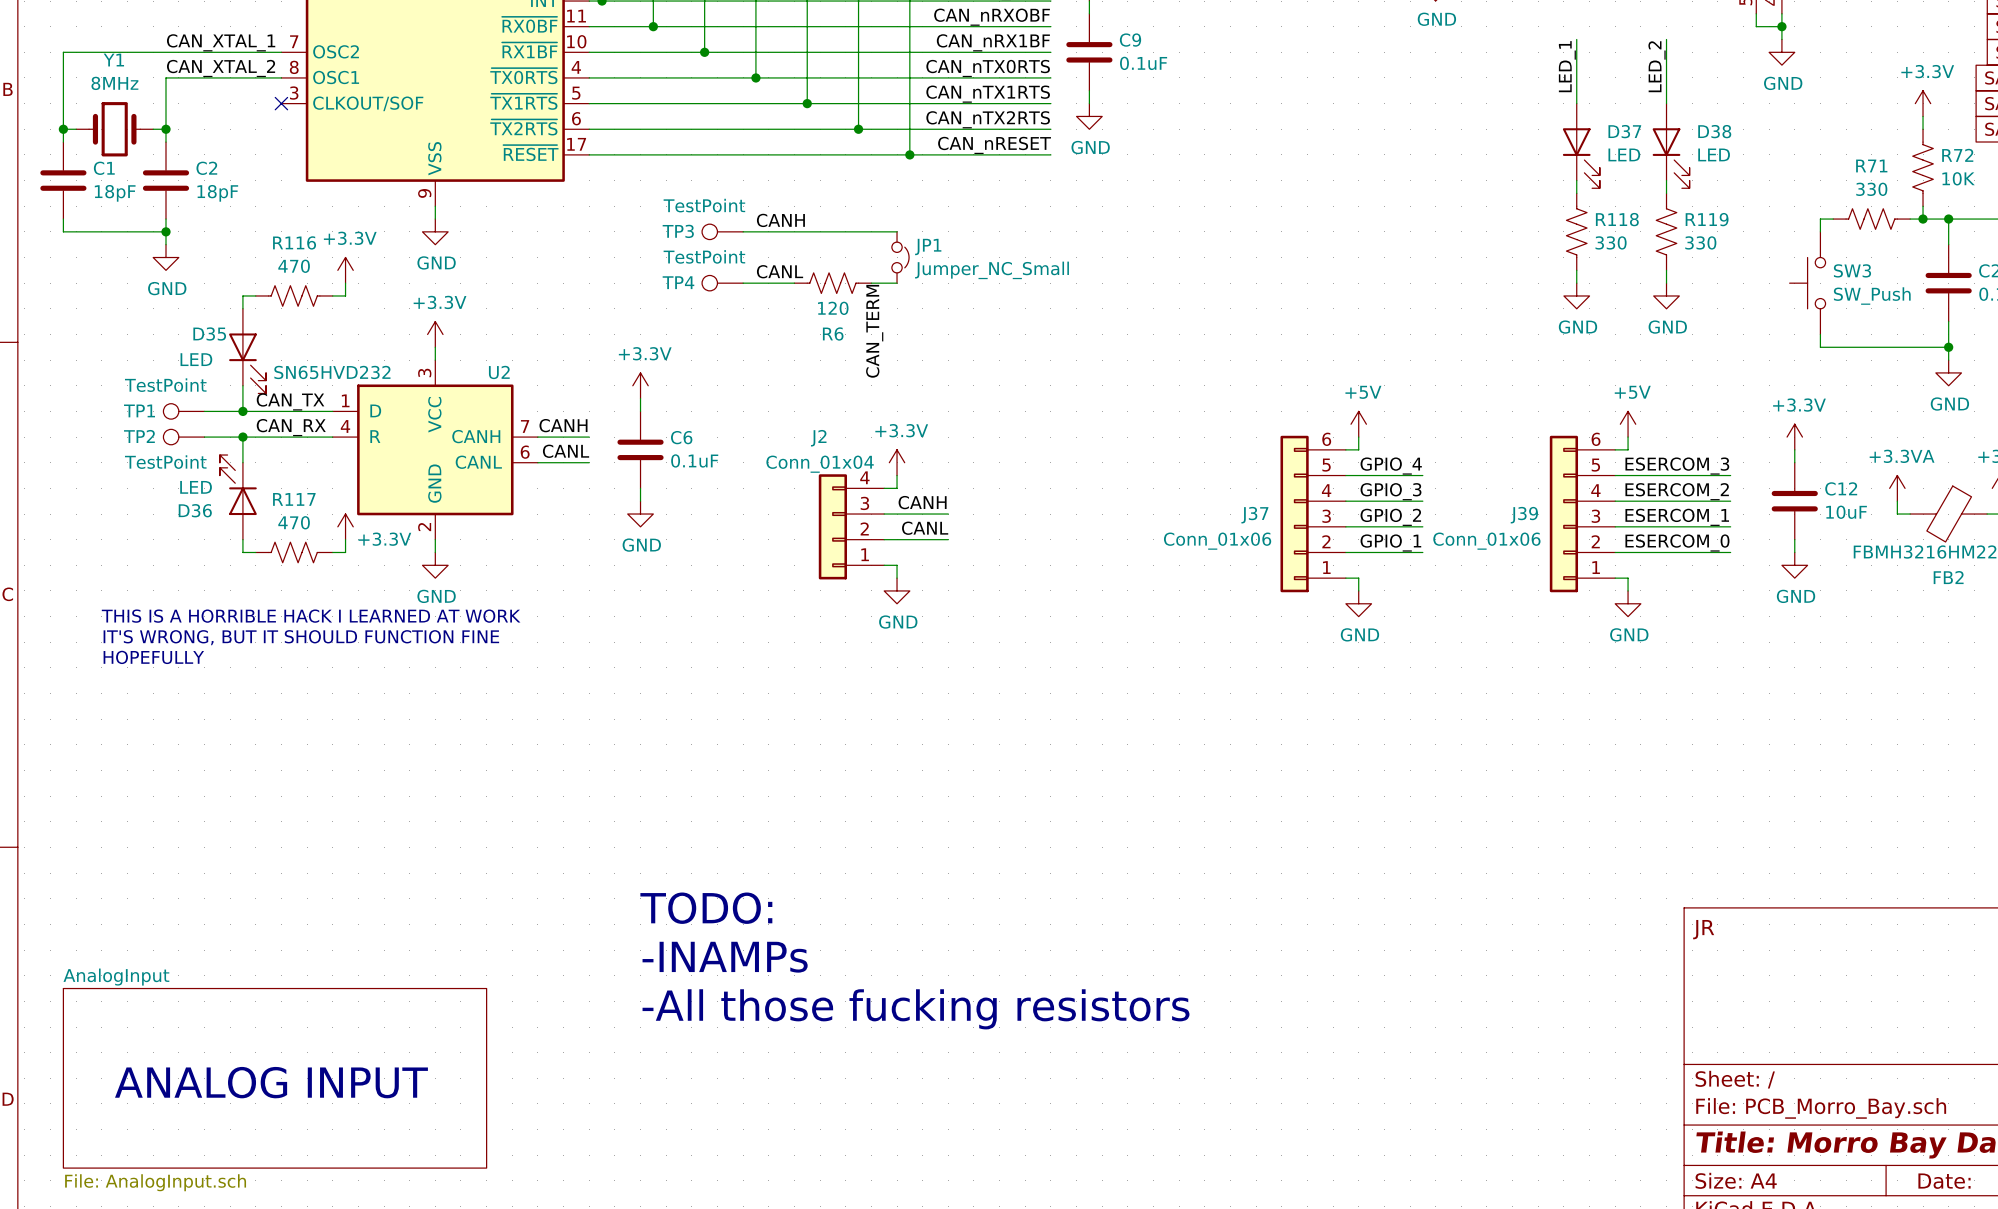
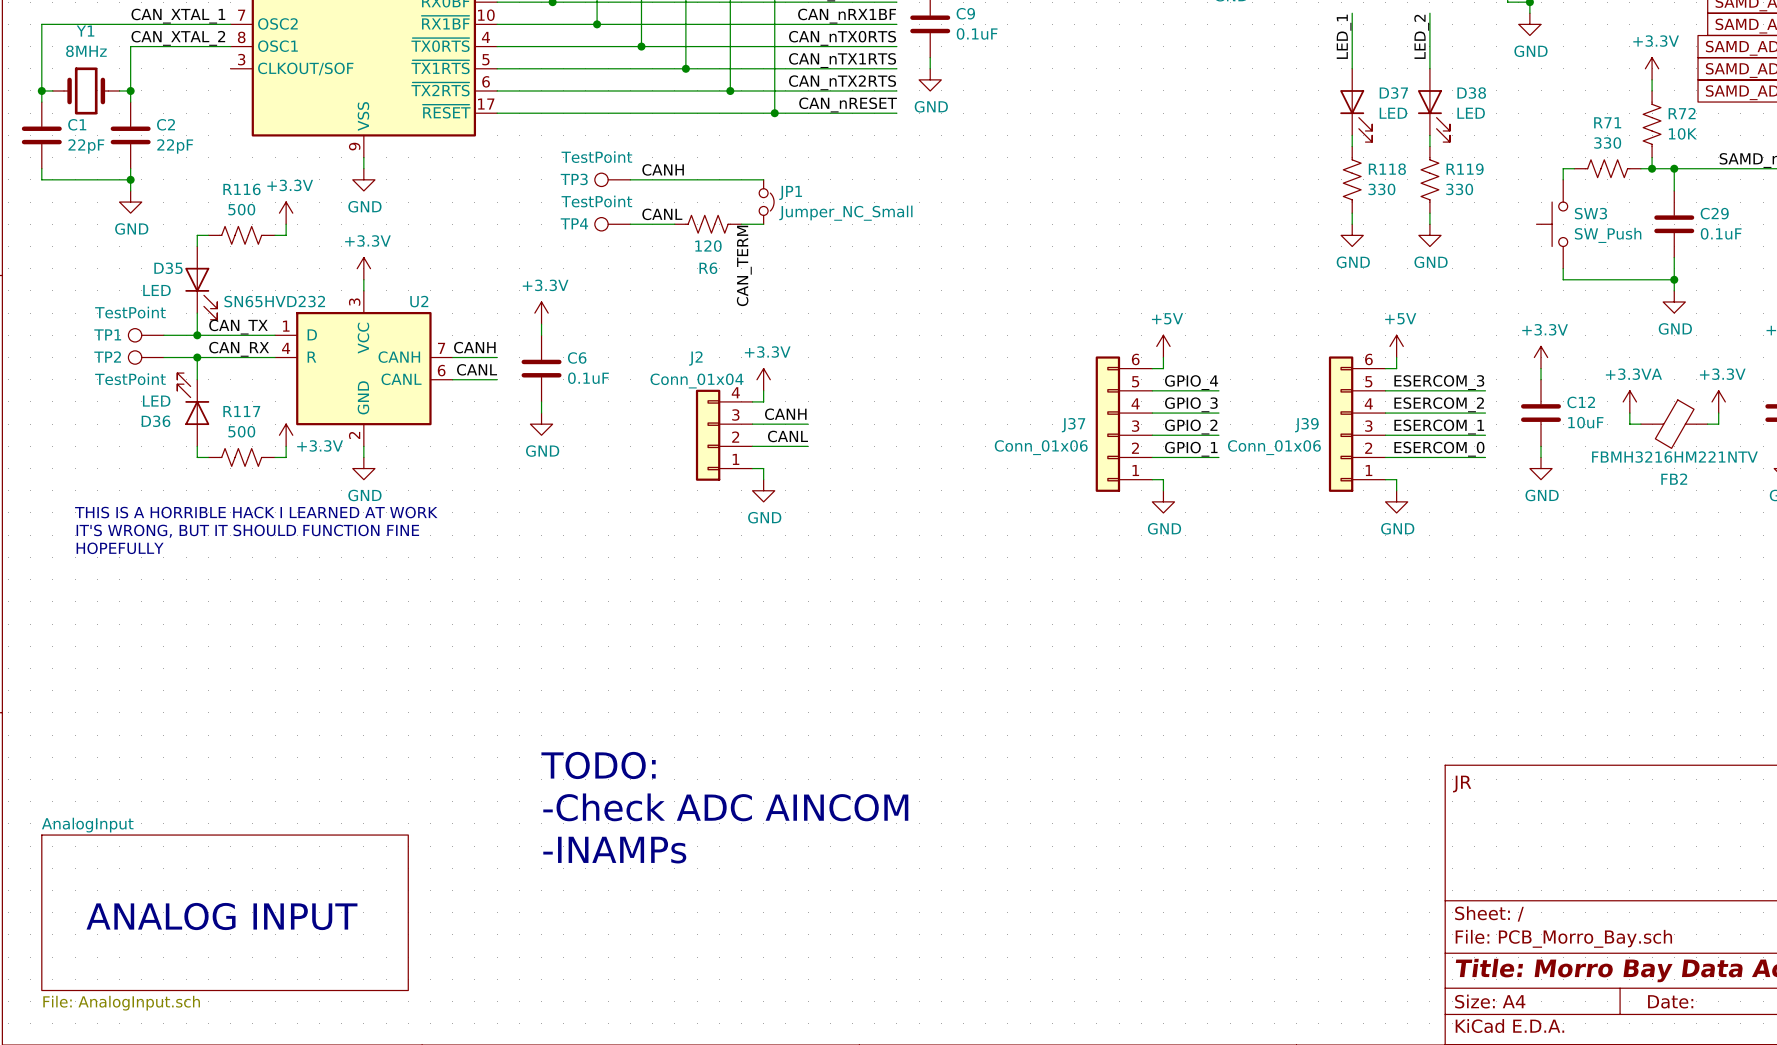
no-connect mark: (281, 103) -> none
C1 value: 18pF (115, 193) -> 22pF (86, 146)
C2 value: 18pF (217, 193) -> 22pF (175, 146)
R116 value: 470 (294, 266) -> 500 (241, 209)
R117 value: 470 (294, 522) -> 500 (241, 431)
text: -INAMPs (725, 957) -> -Check ADC AINCOM (725, 807)
text: -All those fucking resistors (916, 1009) -> -INAMPs (614, 850)

